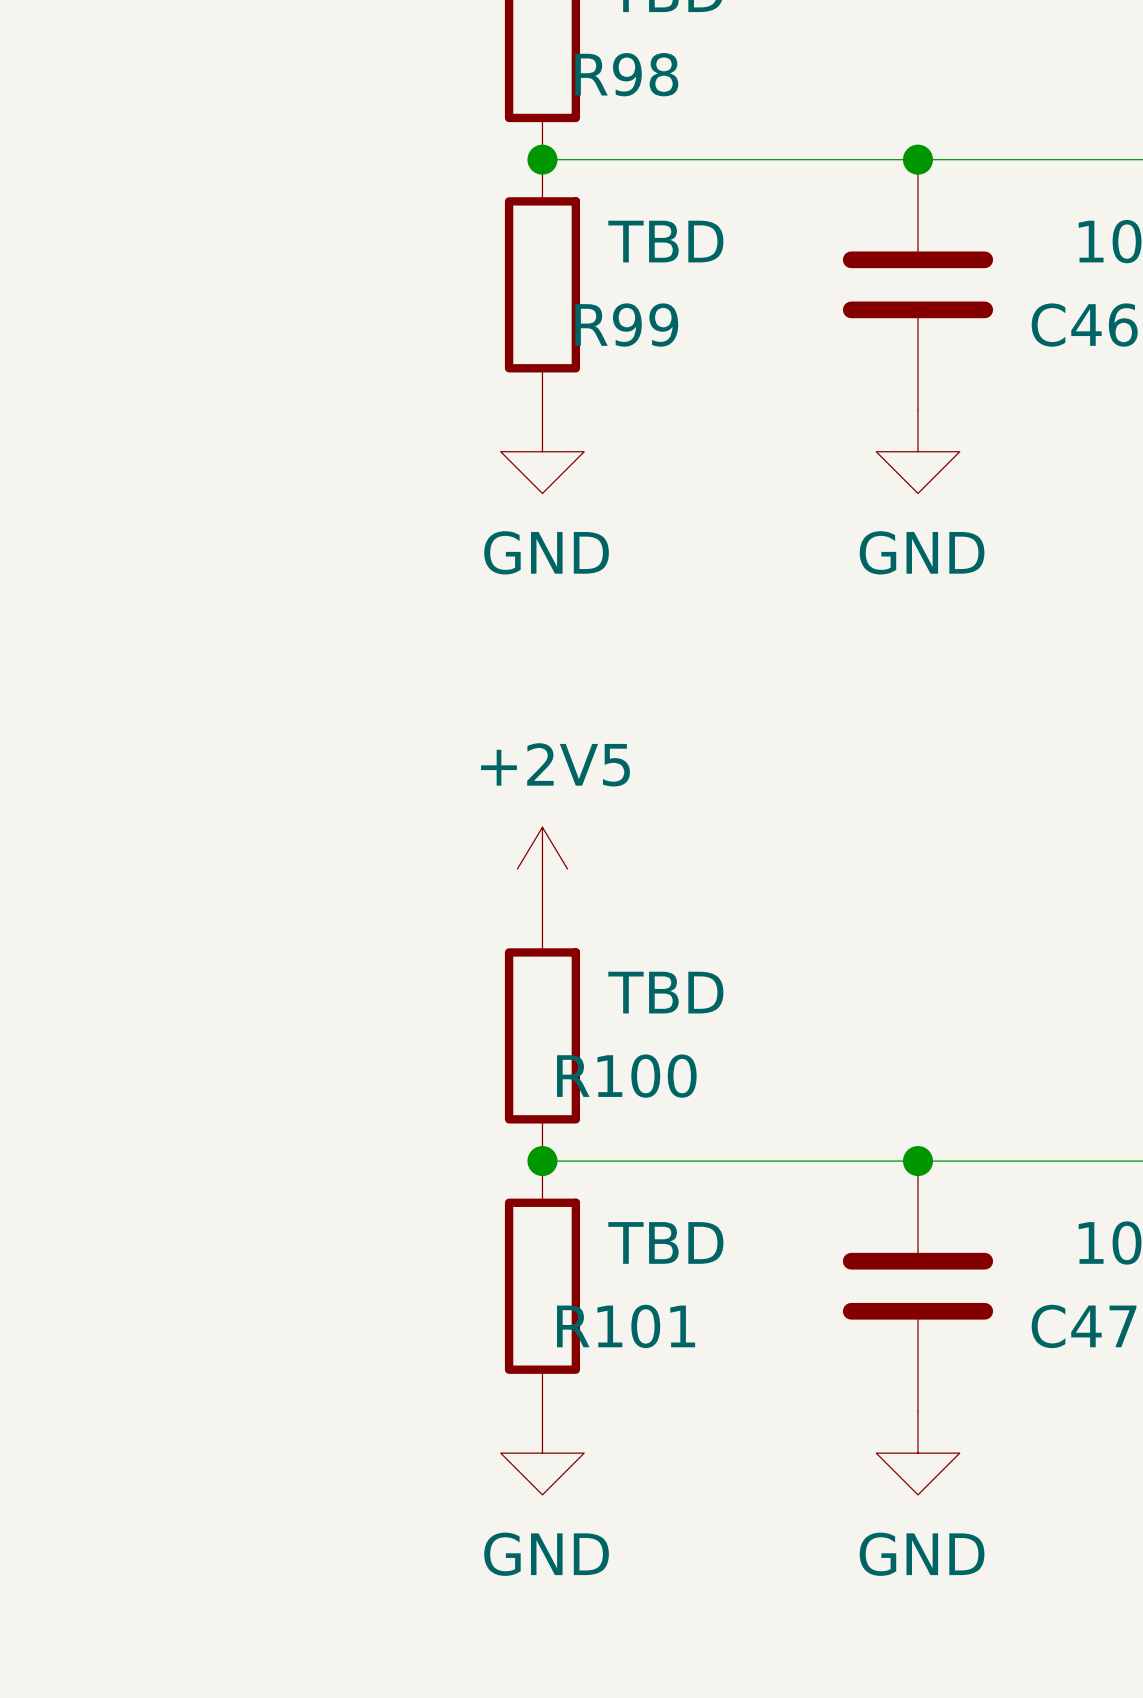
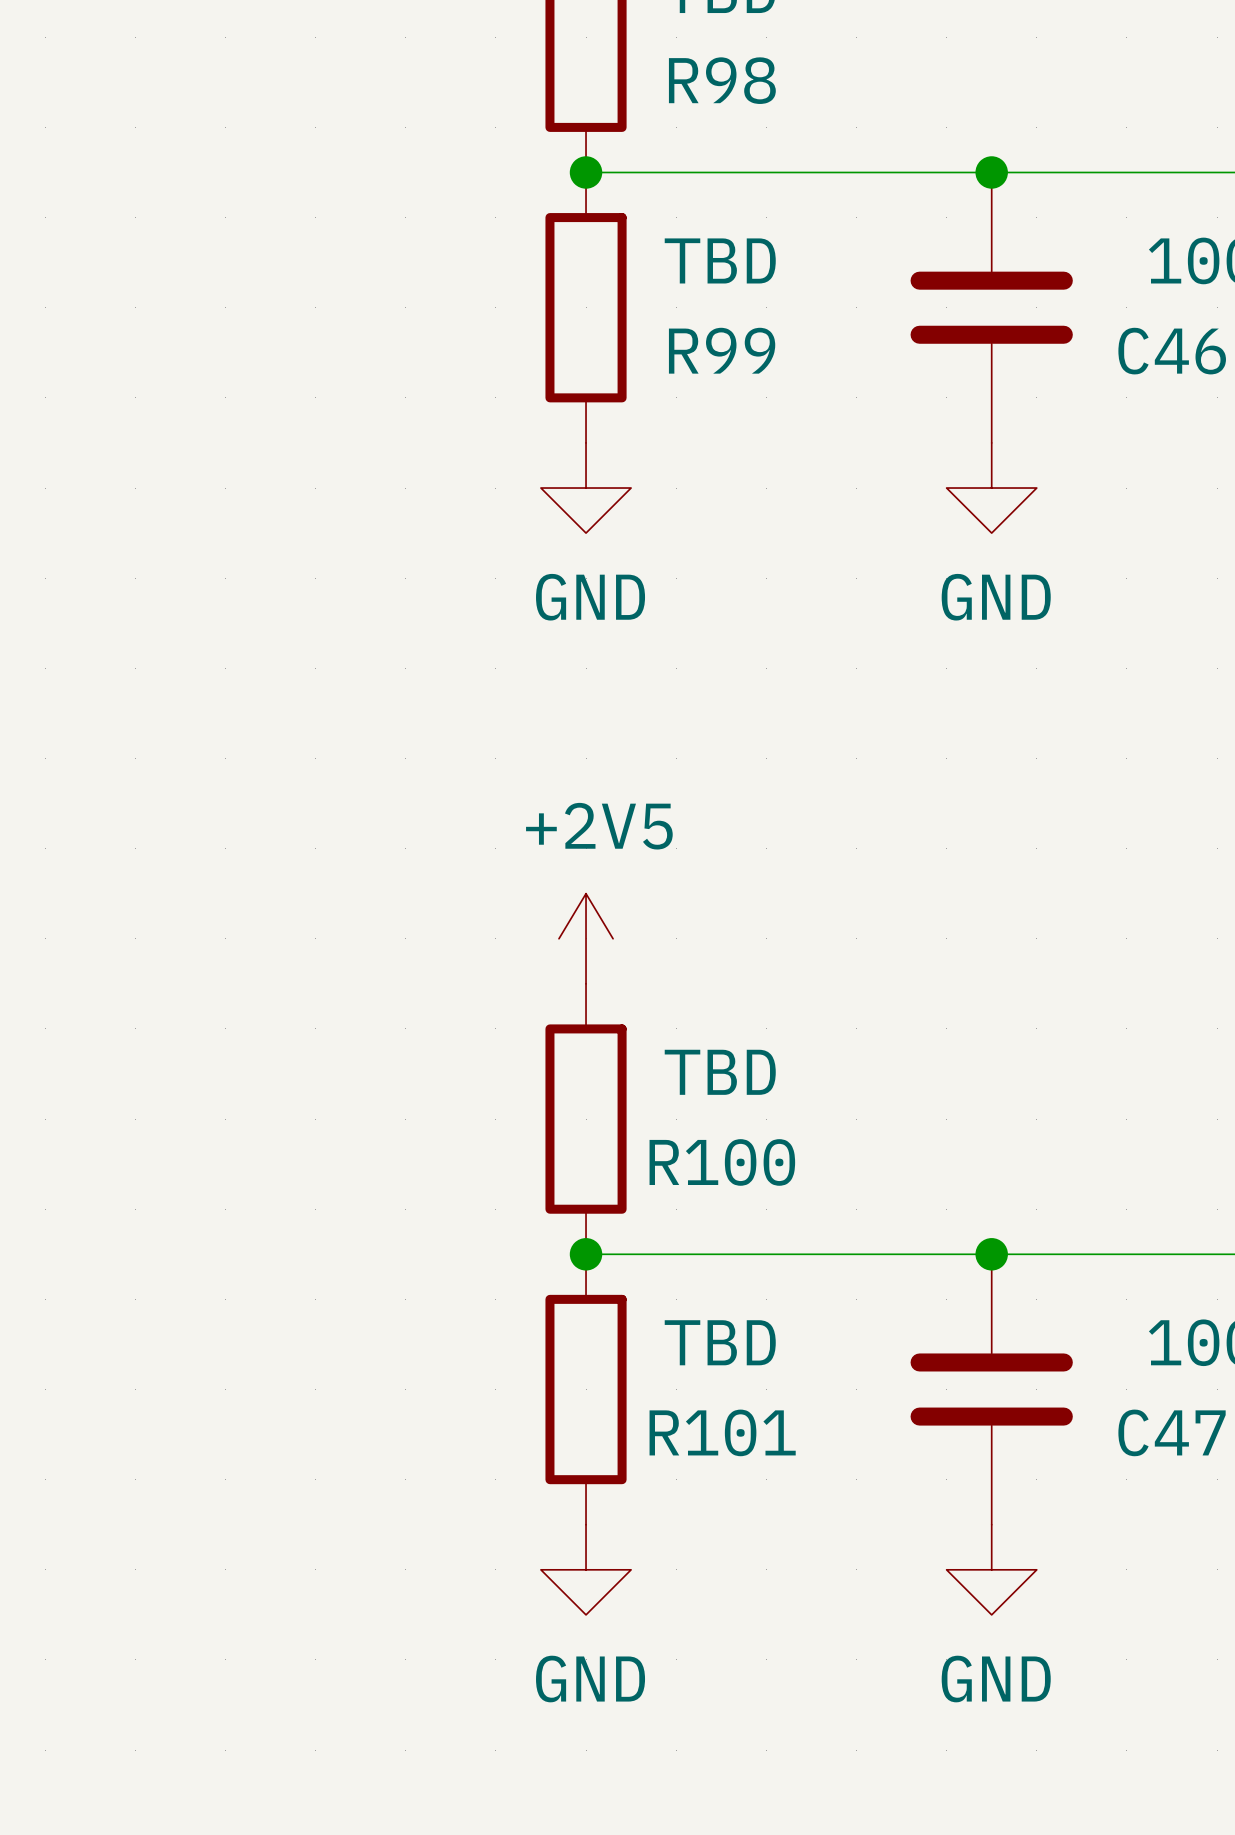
R98 name position: R98 (626, 74) -> R98 (722, 80)
R99 name position: R99 (626, 325) -> R99 (722, 350)
R100 name position: R100 (626, 1076) -> R100 (722, 1162)
R101 name position: R101 (626, 1326) -> R101 (722, 1432)

